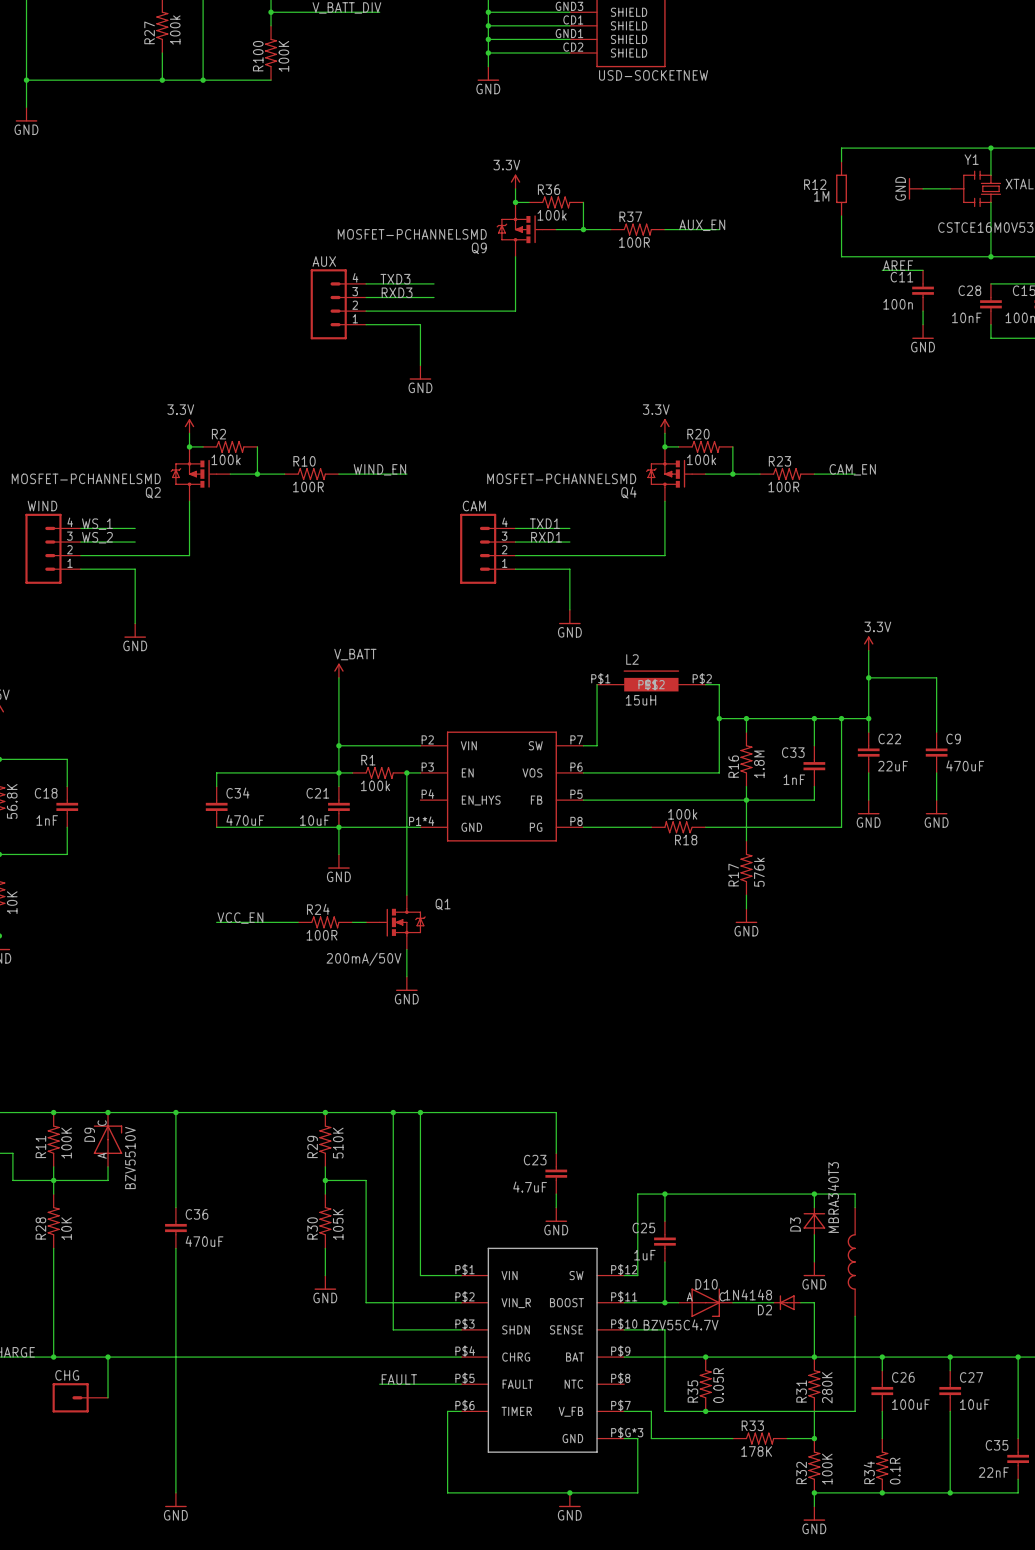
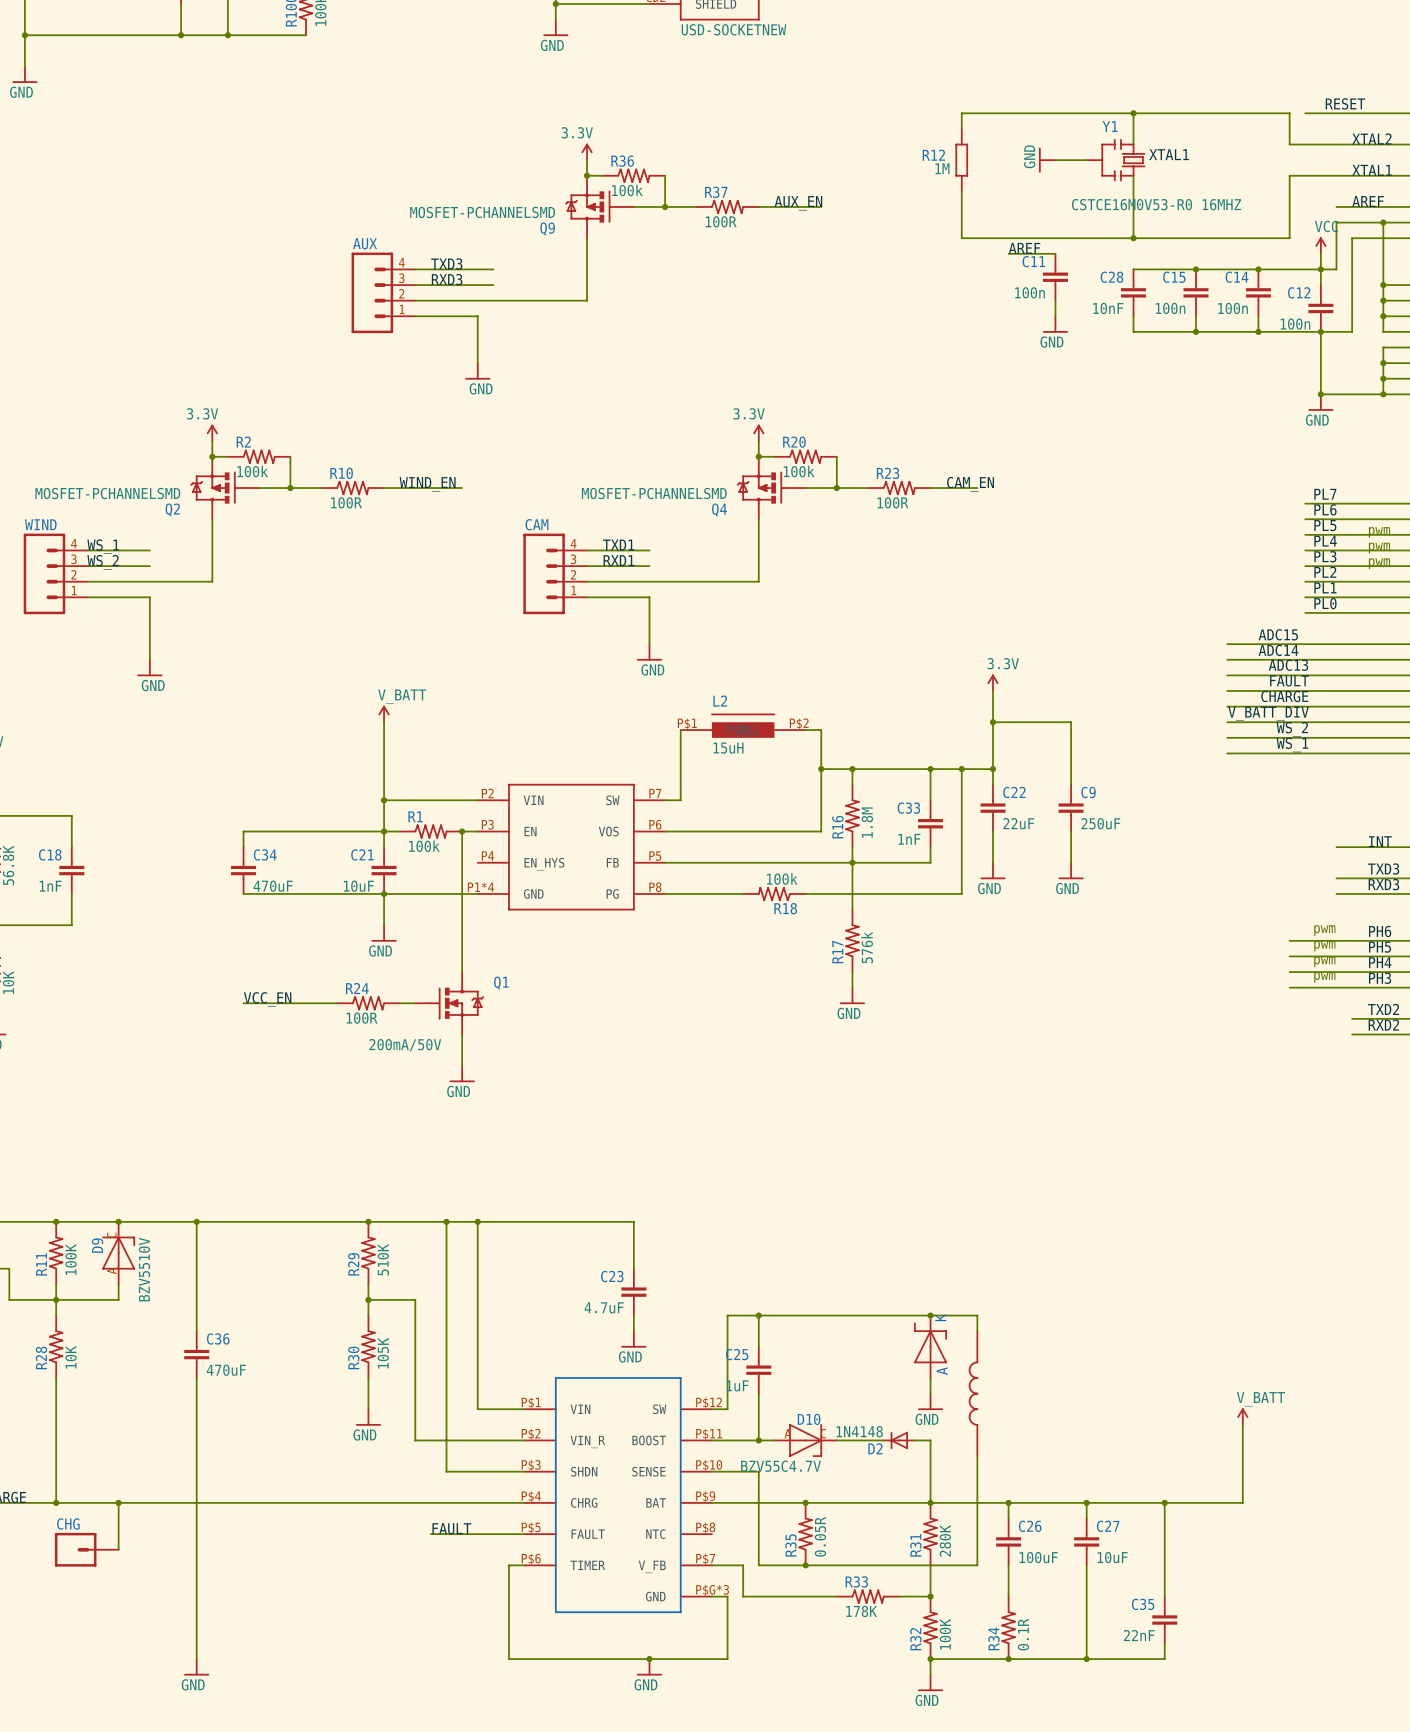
C9 value: 470uF (965, 765) -> 250uF (1100, 823)
D3: MBRA340T3 (814, 1221) -> none
part: none -> (930, 1346)

